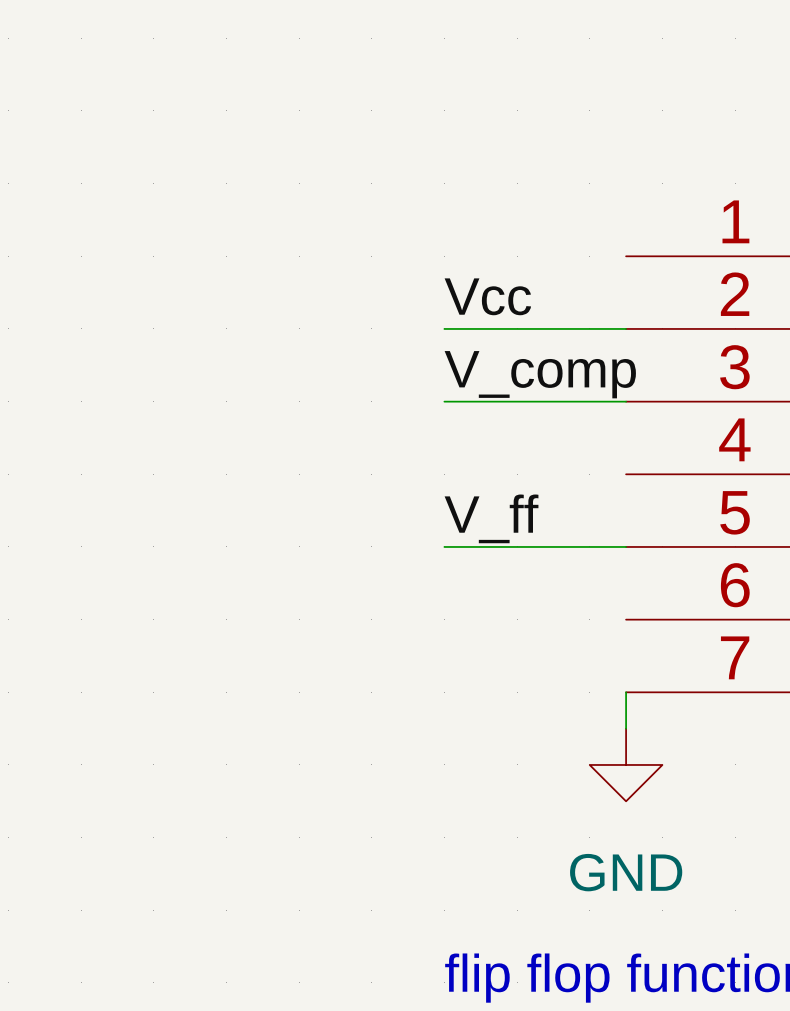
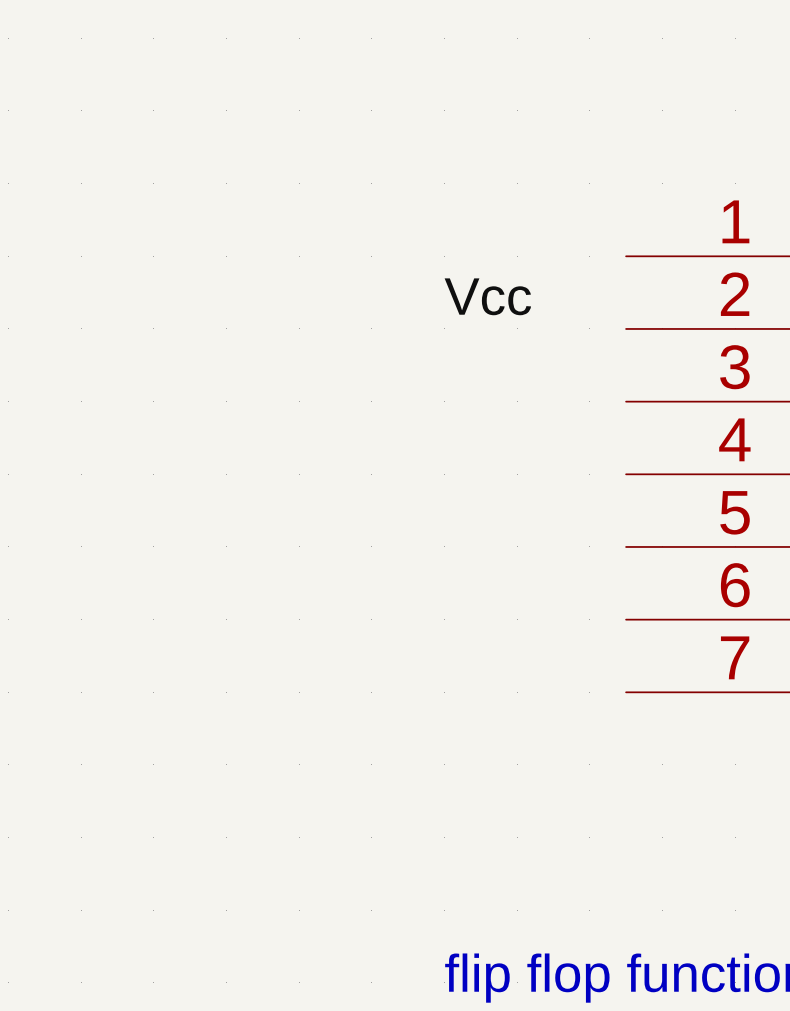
wire: (444, 328) (626, 328) -> none
label: V_comp (540, 374) -> none
wire: (444, 401) (626, 401) -> none
label: V_ff (491, 518) -> none
wire: (444, 546) (626, 546) -> none
wire: (626, 692) (626, 728) -> none
power symbol: GND (626, 764) -> none

